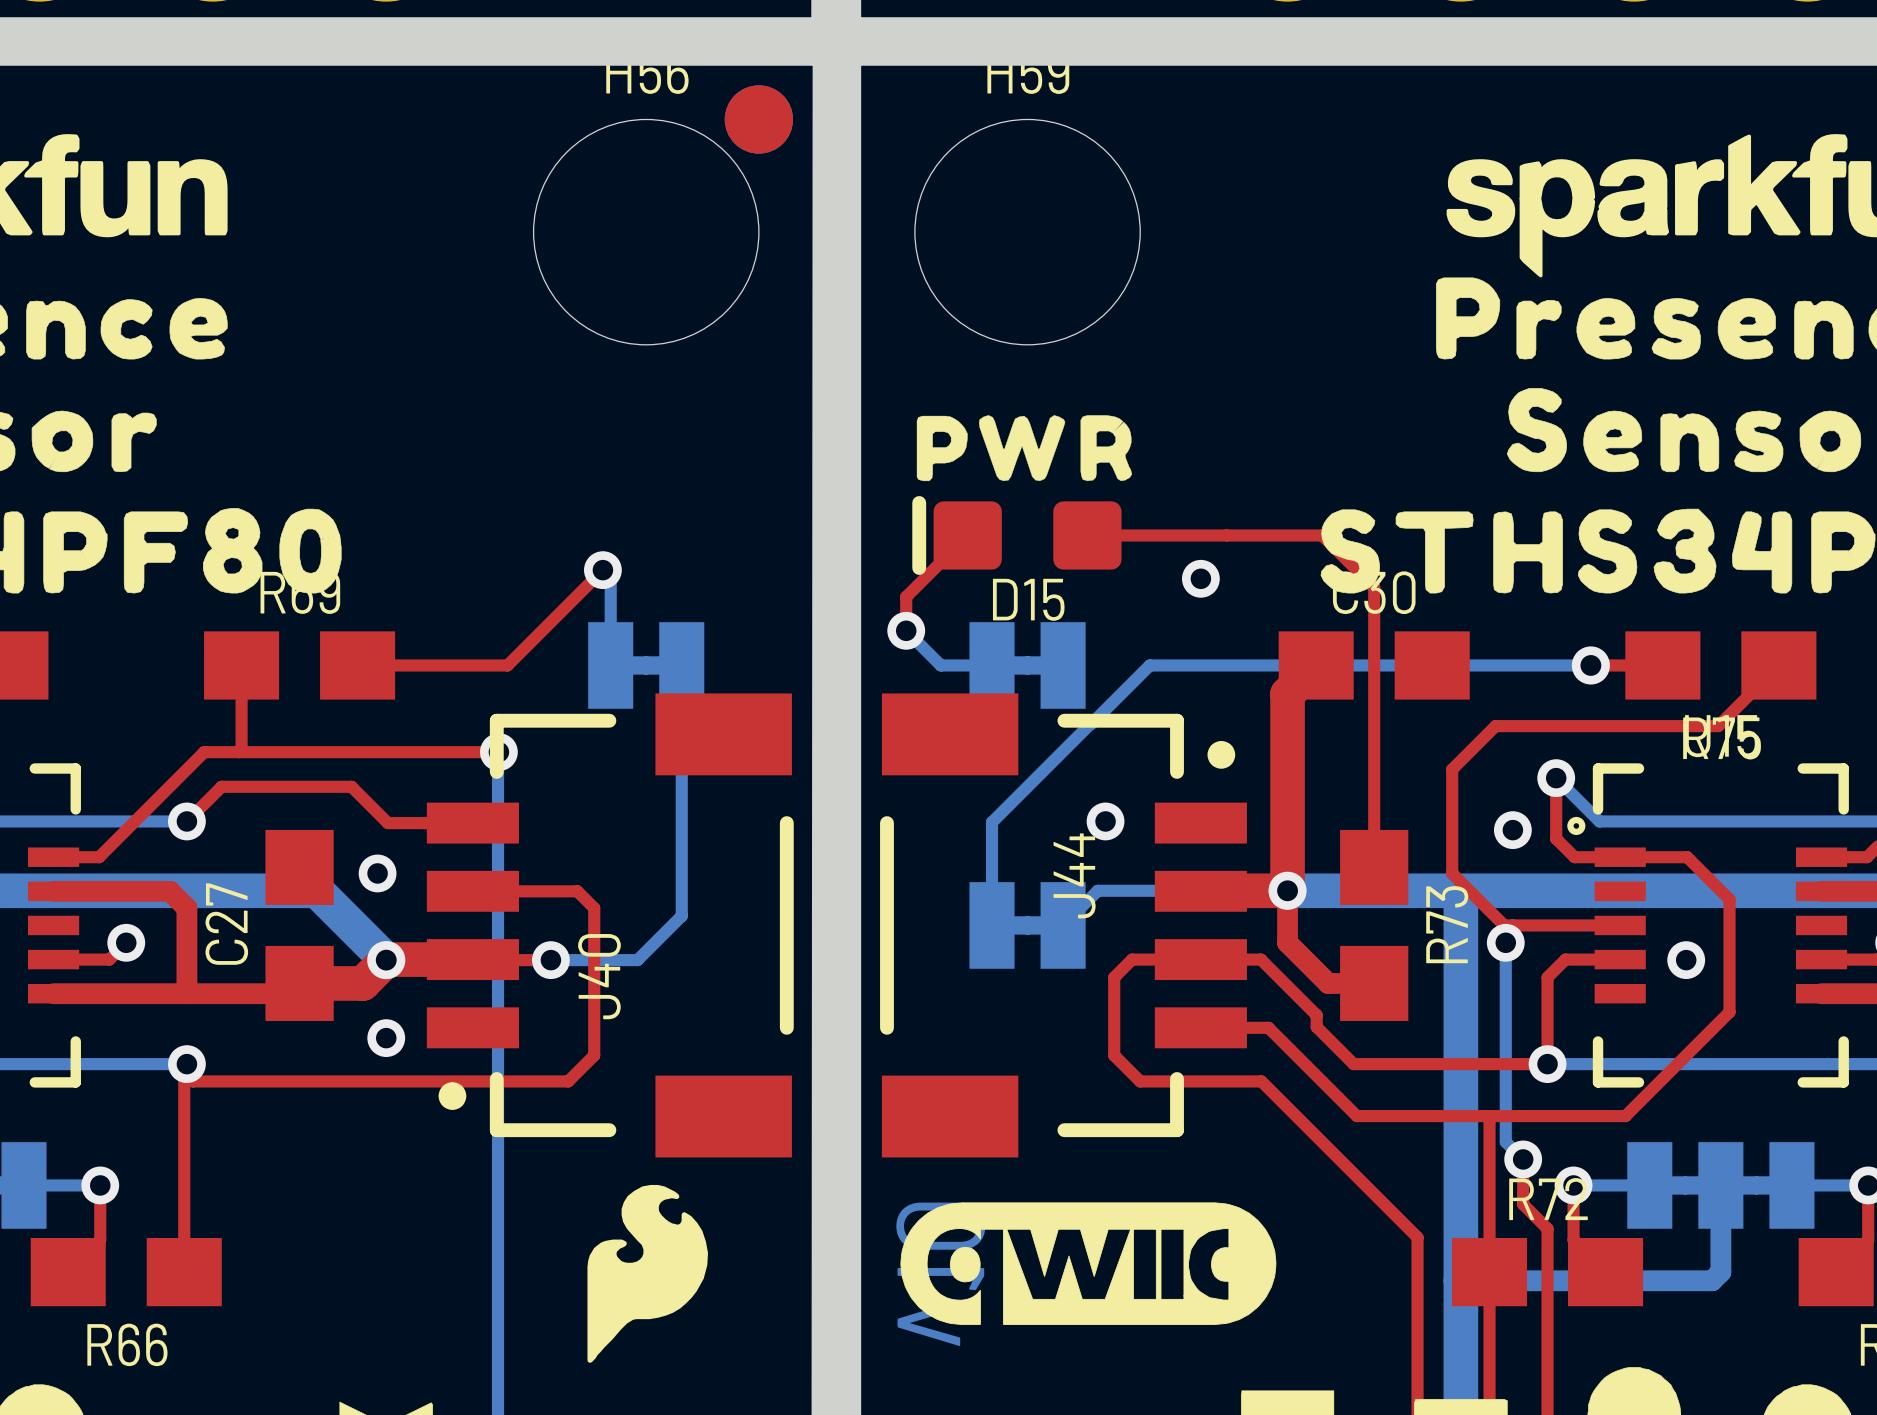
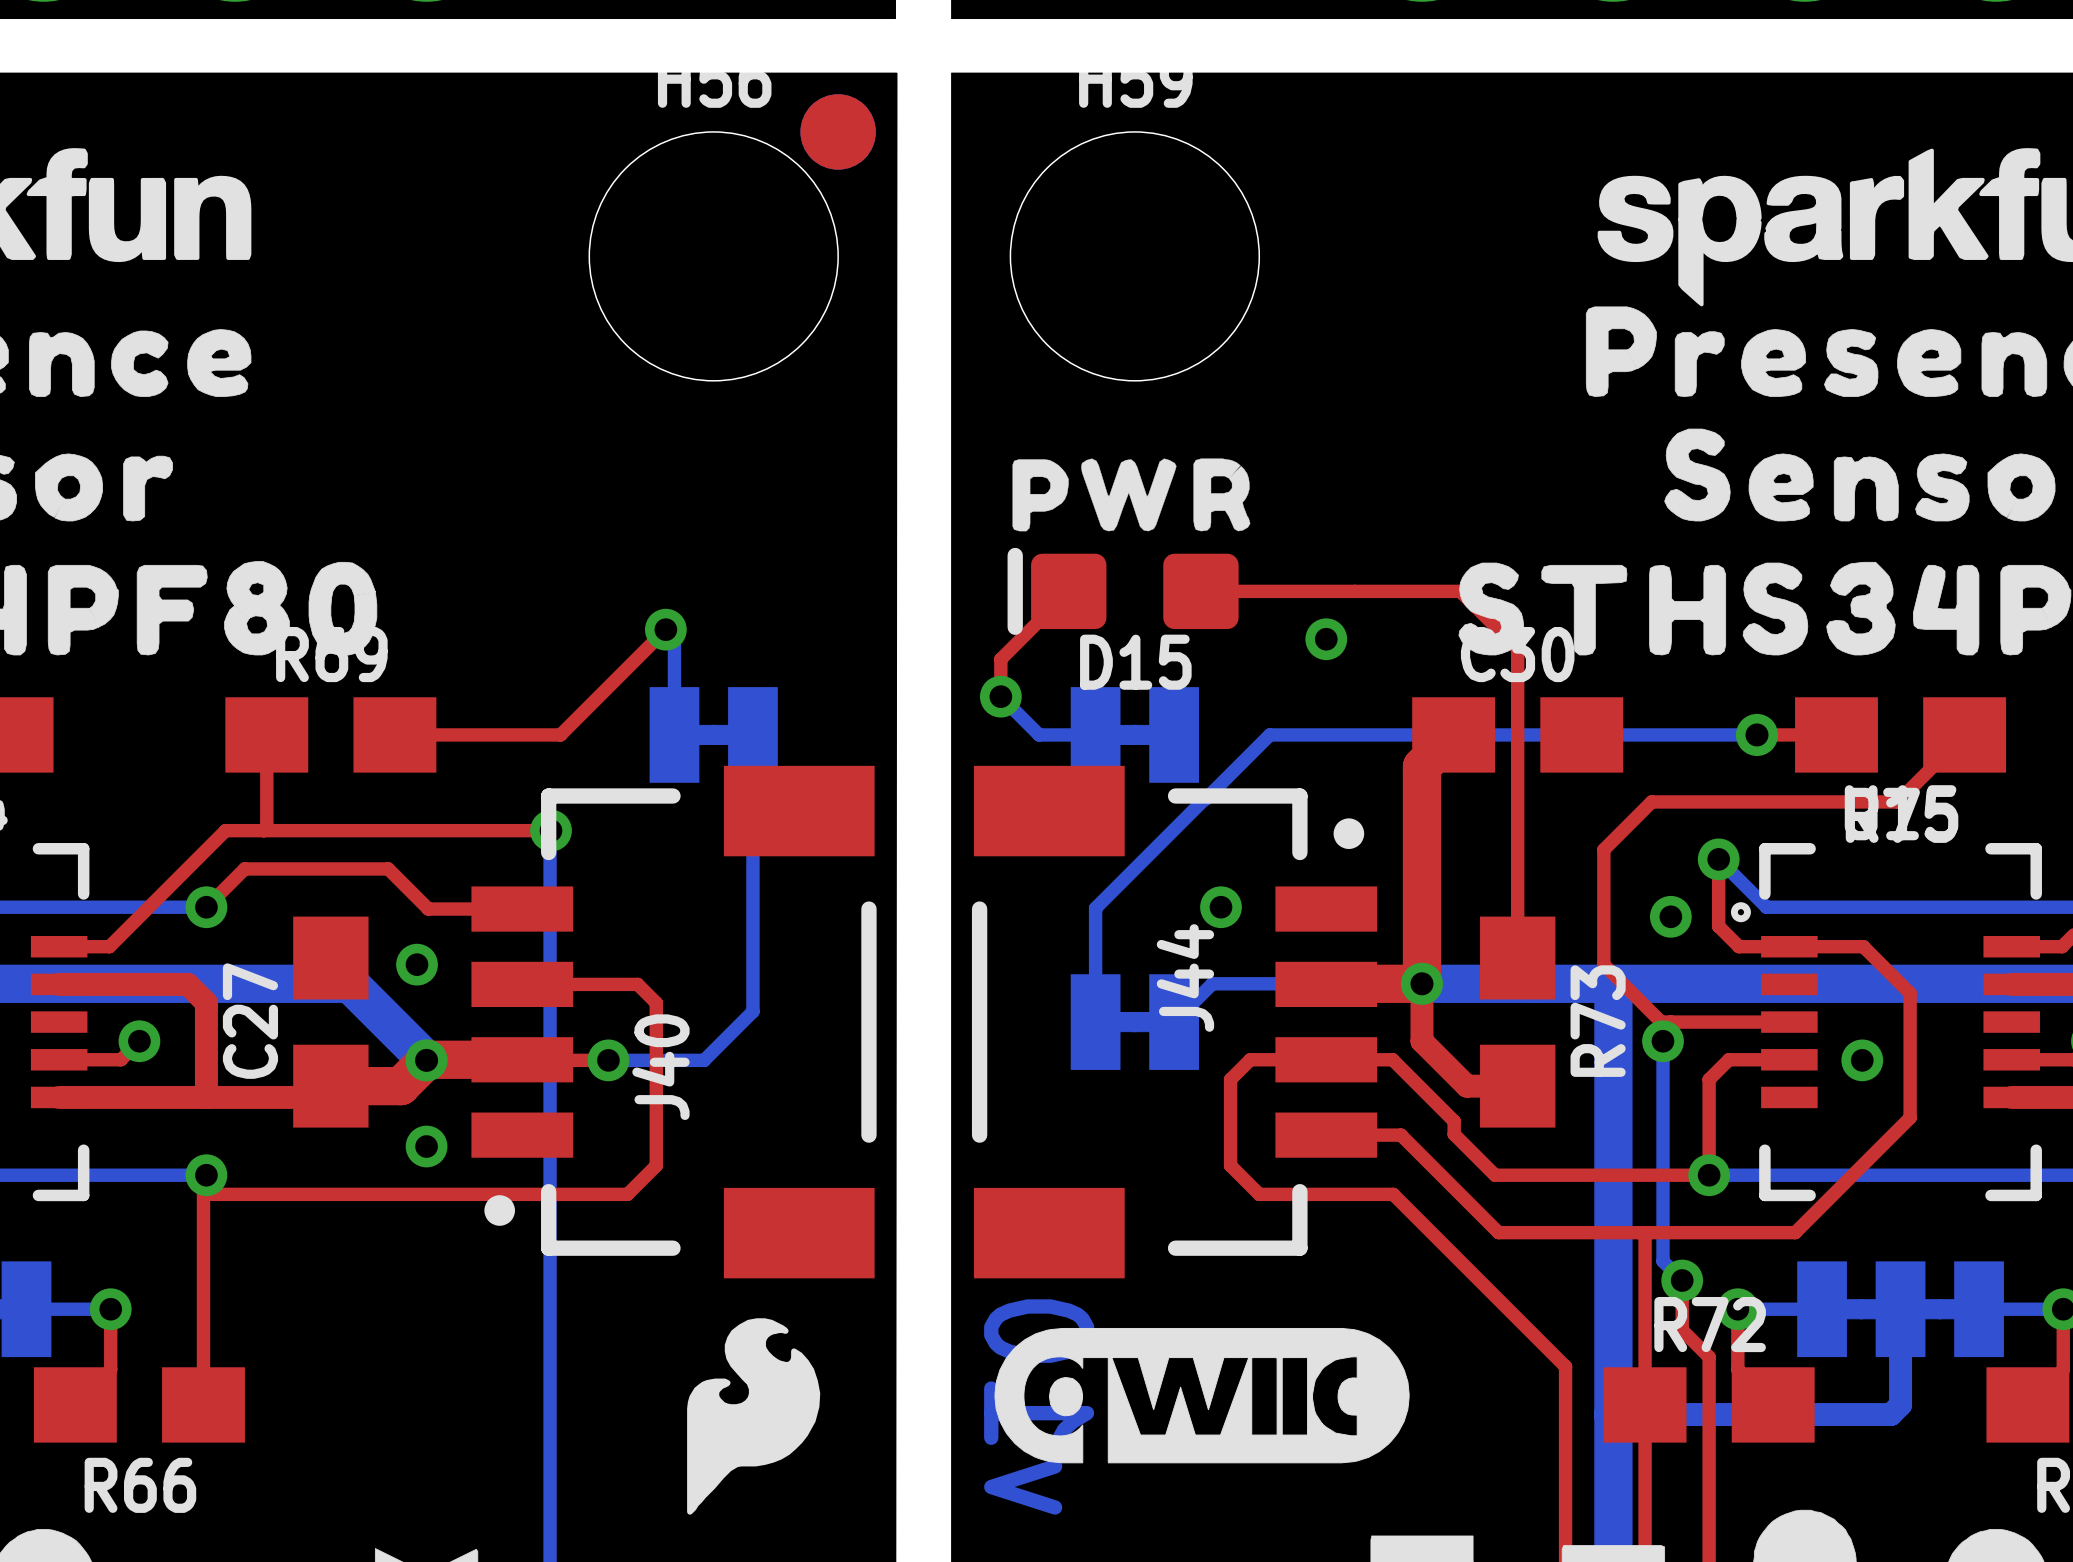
drawing position: (647, 1273) -> (753, 1416)

